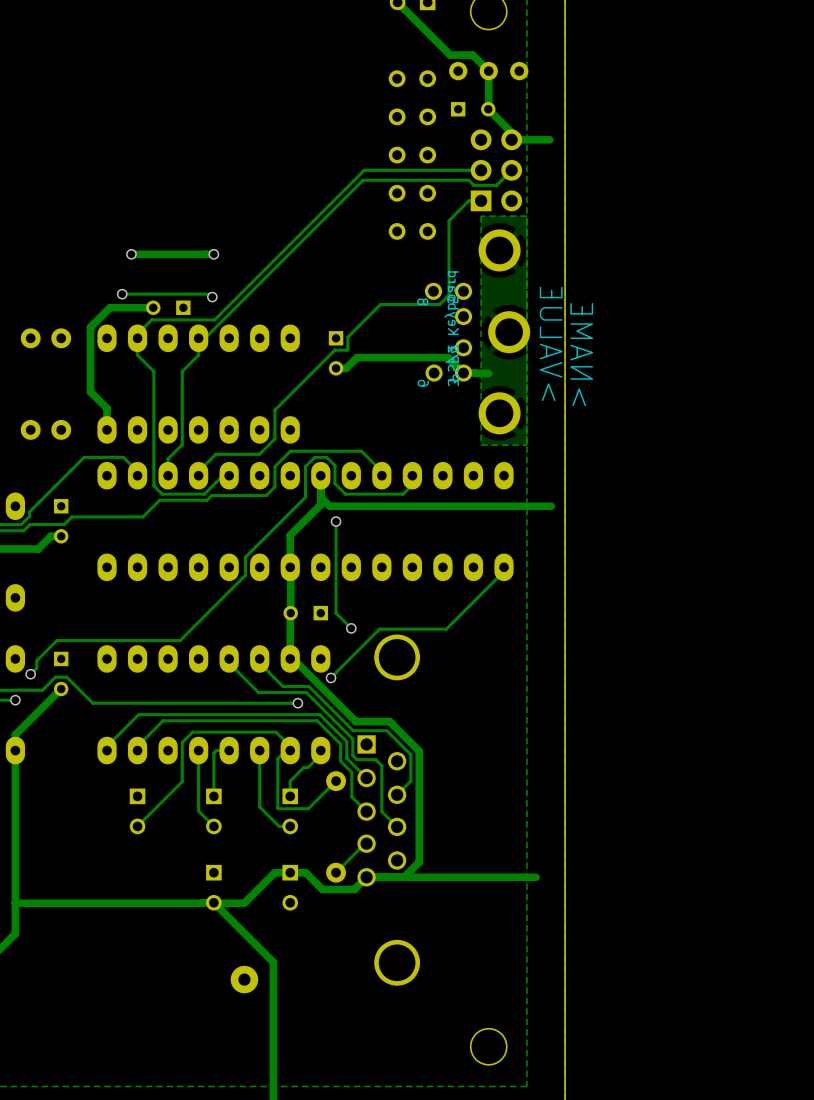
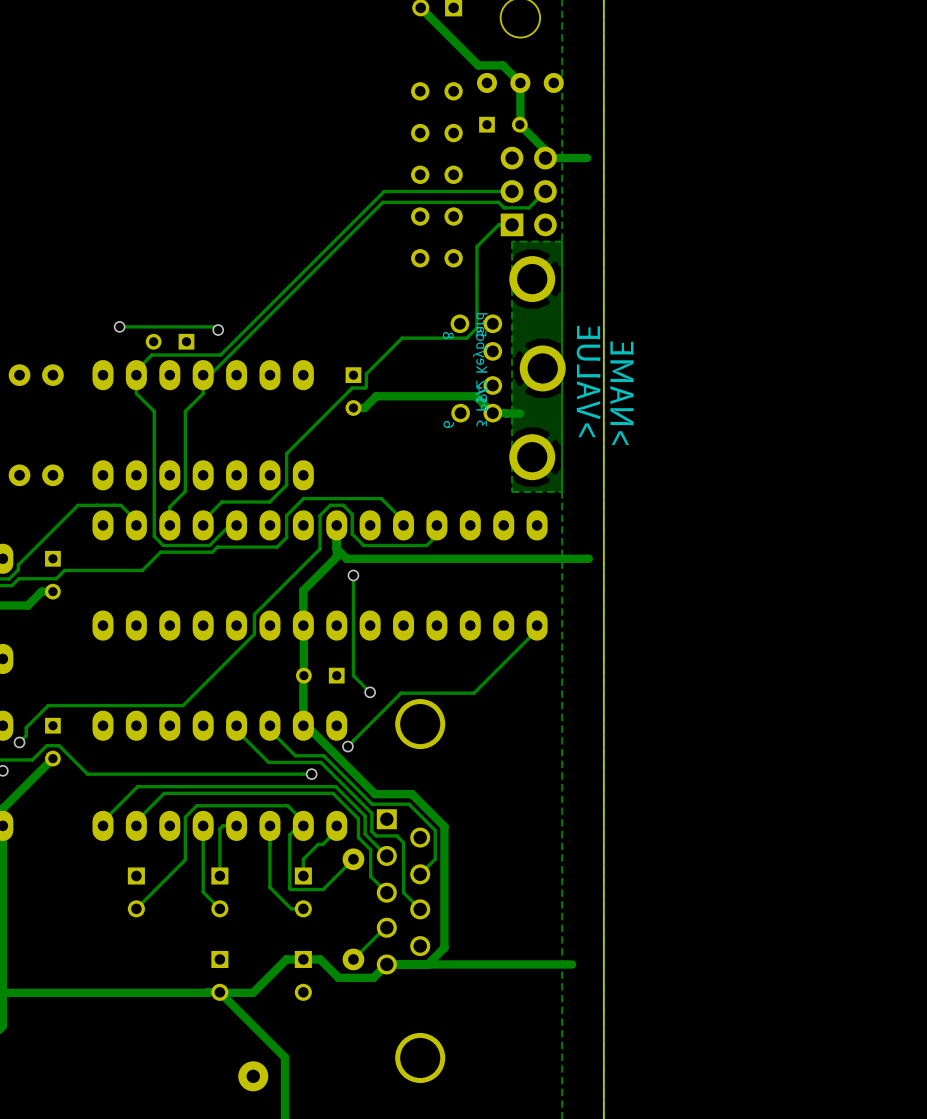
via: (131, 254) -> none
track: (213, 254) (131, 254) -> none
via: (213, 254) -> none
track: (153, 307) (110, 307) (90, 327) (90, 391) (107, 408) (107, 429) -> none

